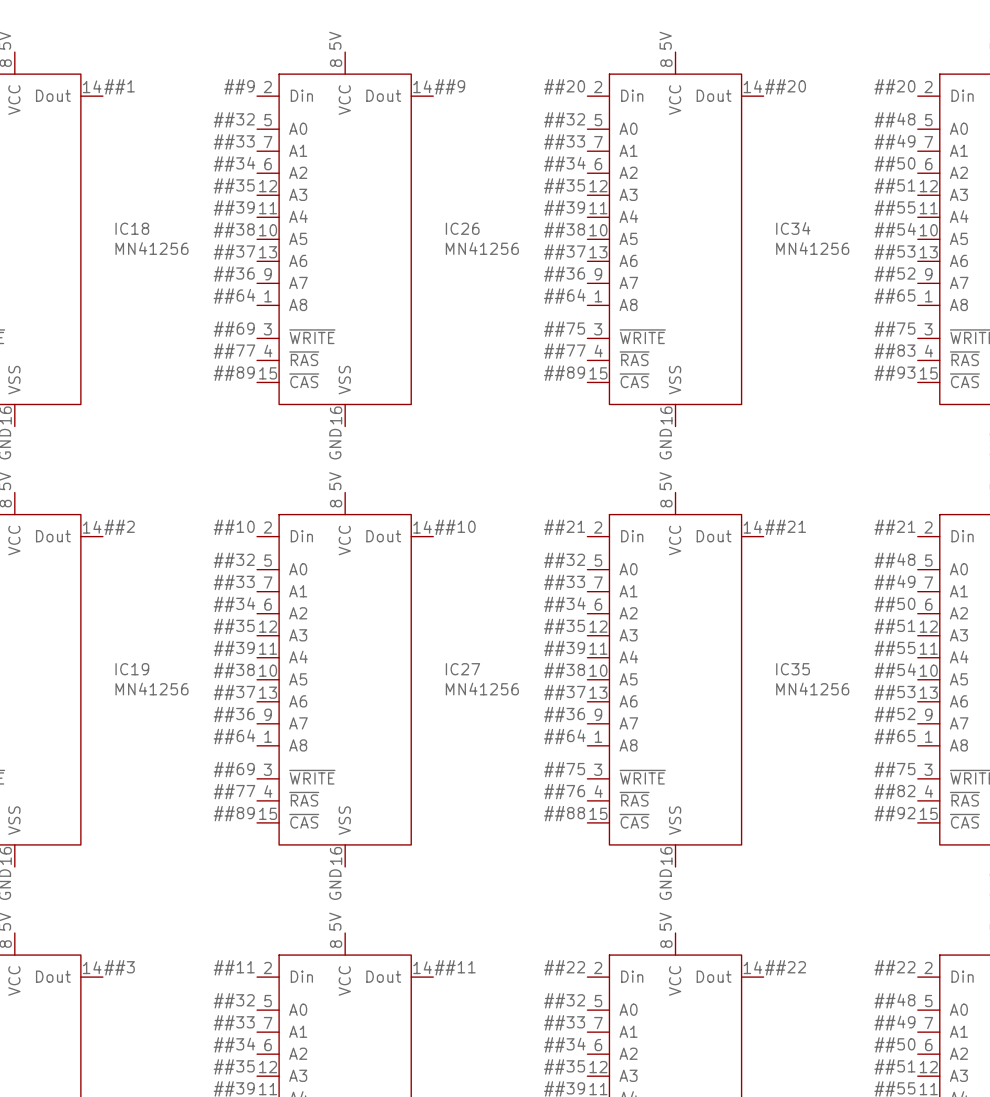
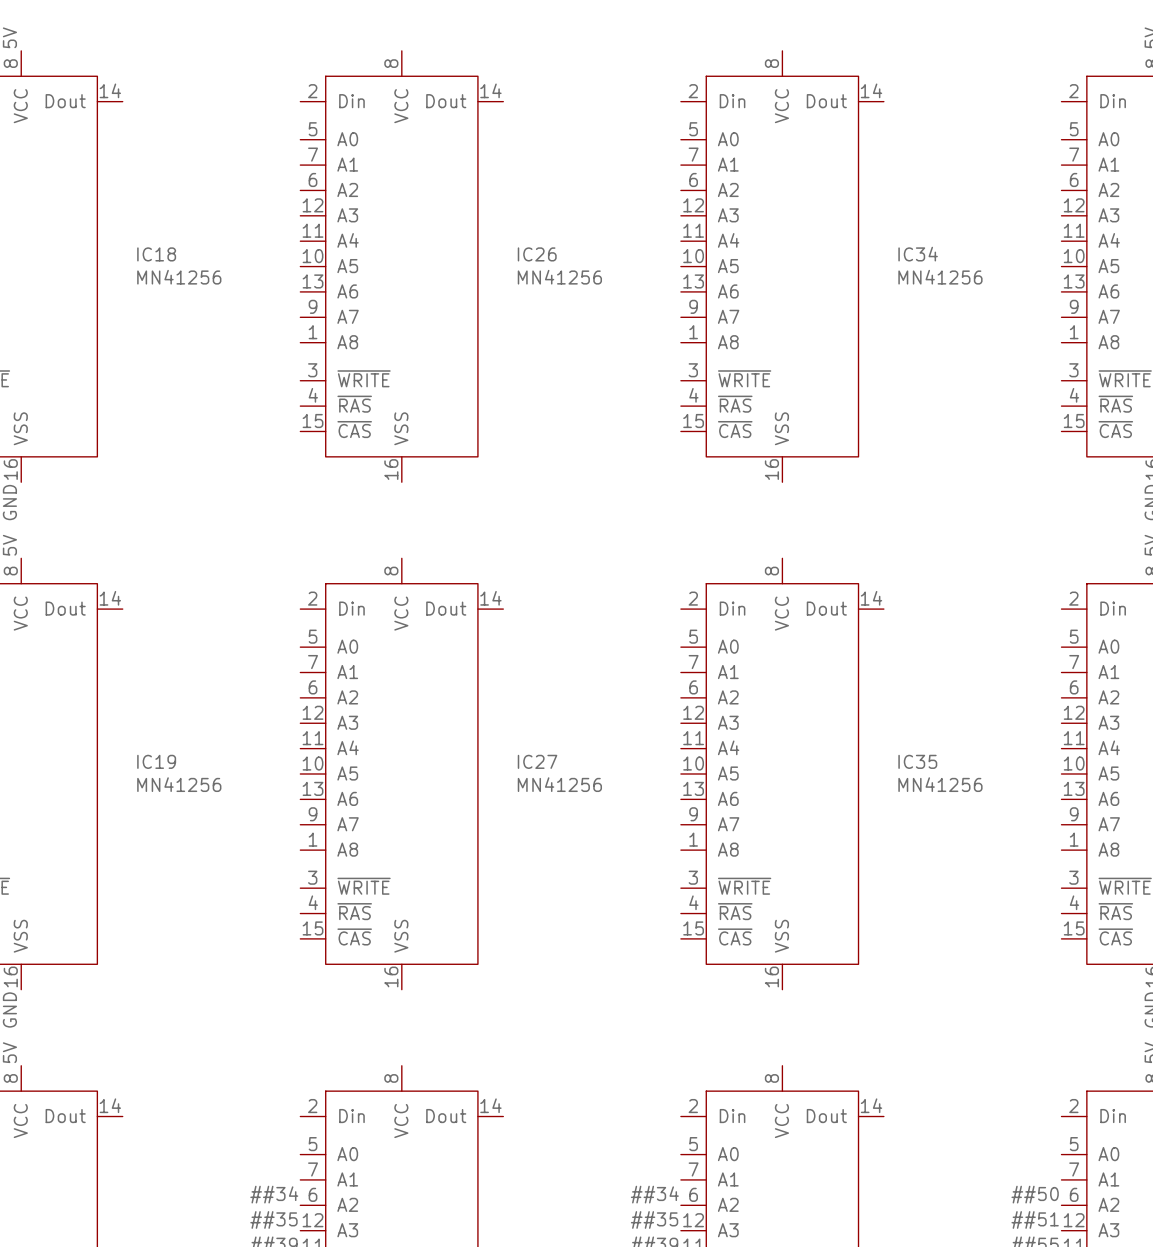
label: 5V (335, 40) -> none
label: 5V (665, 40) -> none
label: ##1 (119, 86) -> none
label: ##9 (239, 86) -> none
label: ##9 (449, 86) -> none
label: ##20 (564, 86) -> none
label: ##20 (785, 86) -> none
label: ##20 (894, 86) -> none
label: ##32 (234, 119) -> none
label: ##32 (564, 119) -> none
label: ##48 (894, 119) -> none
label: ##33 (234, 141) -> none
label: ##33 (564, 141) -> none
label: ##49 (894, 141) -> none
label: ##34 (234, 163) -> none
label: ##34 (564, 163) -> none
label: ##50 (894, 163) -> none
label: ##35 (234, 185) -> none
label: ##35 (564, 185) -> none
label: ##51 (894, 185) -> none
label: ##39 (234, 207) -> none
label: ##39 (564, 207) -> none
label: ##55 (894, 207) -> none
label: ##38 (234, 230) -> none
label: ##38 (564, 230) -> none
label: ##54 (895, 230) -> none
label: ##37 (234, 252) -> none
label: ##37 (564, 252) -> none
label: ##53 (894, 252) -> none
label: ##36 (234, 274) -> none
label: ##36 (564, 274) -> none
label: ##52 (894, 274) -> none
label: ##64 (234, 296) -> none
label: ##64 (564, 296) -> none
label: ##65 (894, 296) -> none
label: ##69 (234, 329) -> none
label: ##75 (564, 329) -> none
label: ##75 (894, 329) -> none
label: ##77 (234, 351) -> none
label: ##77 (564, 351) -> none
label: ##83 (894, 351) -> none
label: ##89 (234, 373) -> none
label: ##89 (564, 373) -> none
label: ##93 (894, 373) -> none
label: GND (335, 444) -> none
label: GND (665, 444) -> none
label: 5V (335, 481) -> none
label: 5V (665, 481) -> none
label: ##2 (119, 527) -> none
label: ##10 (234, 527) -> none
label: ##10 (455, 527) -> none
label: ##21 (564, 527) -> none
label: ##21 (785, 527) -> none
label: ##21 (894, 527) -> none
label: ##32 (234, 560) -> none
label: ##32 (564, 560) -> none
label: ##48 (894, 560) -> none
label: ##33 (234, 582) -> none
label: ##33 (564, 582) -> none
label: ##49 (894, 582) -> none
label: ##34 (234, 604) -> none
label: ##34 (564, 604) -> none
label: ##50 (894, 604) -> none
label: ##35 (234, 626) -> none
label: ##35 (564, 626) -> none
label: ##51 (894, 626) -> none
label: ##39 (234, 648) -> none
label: ##39 (564, 648) -> none
label: ##55 (894, 648) -> none
label: ##38 (234, 670) -> none
label: ##38 (564, 670) -> none
label: ##54 (895, 670) -> none
label: ##37 (234, 692) -> none
label: ##37 (564, 692) -> none
label: ##53 (894, 692) -> none
label: ##36 (234, 714) -> none
label: ##36 (564, 714) -> none
label: ##52 (894, 714) -> none
label: ##64 (234, 736) -> none
label: ##64 (564, 736) -> none
label: ##65 (894, 736) -> none
label: ##69 (234, 769) -> none
label: ##75 (564, 769) -> none
label: ##75 (894, 769) -> none
label: ##77 (234, 791) -> none
label: ##76 (564, 791) -> none
label: ##82 (894, 791) -> none
label: ##89 (234, 813) -> none
label: ##88 (564, 813) -> none
label: ##92 (894, 813) -> none
label: GND (335, 884) -> none
label: GND (665, 884) -> none
label: 5V (335, 921) -> none
label: 5V (665, 921) -> none
label: ##3 (119, 967) -> none
label: ##11 (234, 967) -> none
label: ##11 (455, 967) -> none
label: ##22 (564, 967) -> none
label: ##22 (785, 967) -> none
label: ##22 (894, 967) -> none
label: ##32 (234, 1000) -> none
label: ##32 (564, 1000) -> none
label: ##48 (894, 1000) -> none
label: ##33 (234, 1022) -> none
label: ##33 (564, 1022) -> none
label: ##49 (894, 1022) -> none

